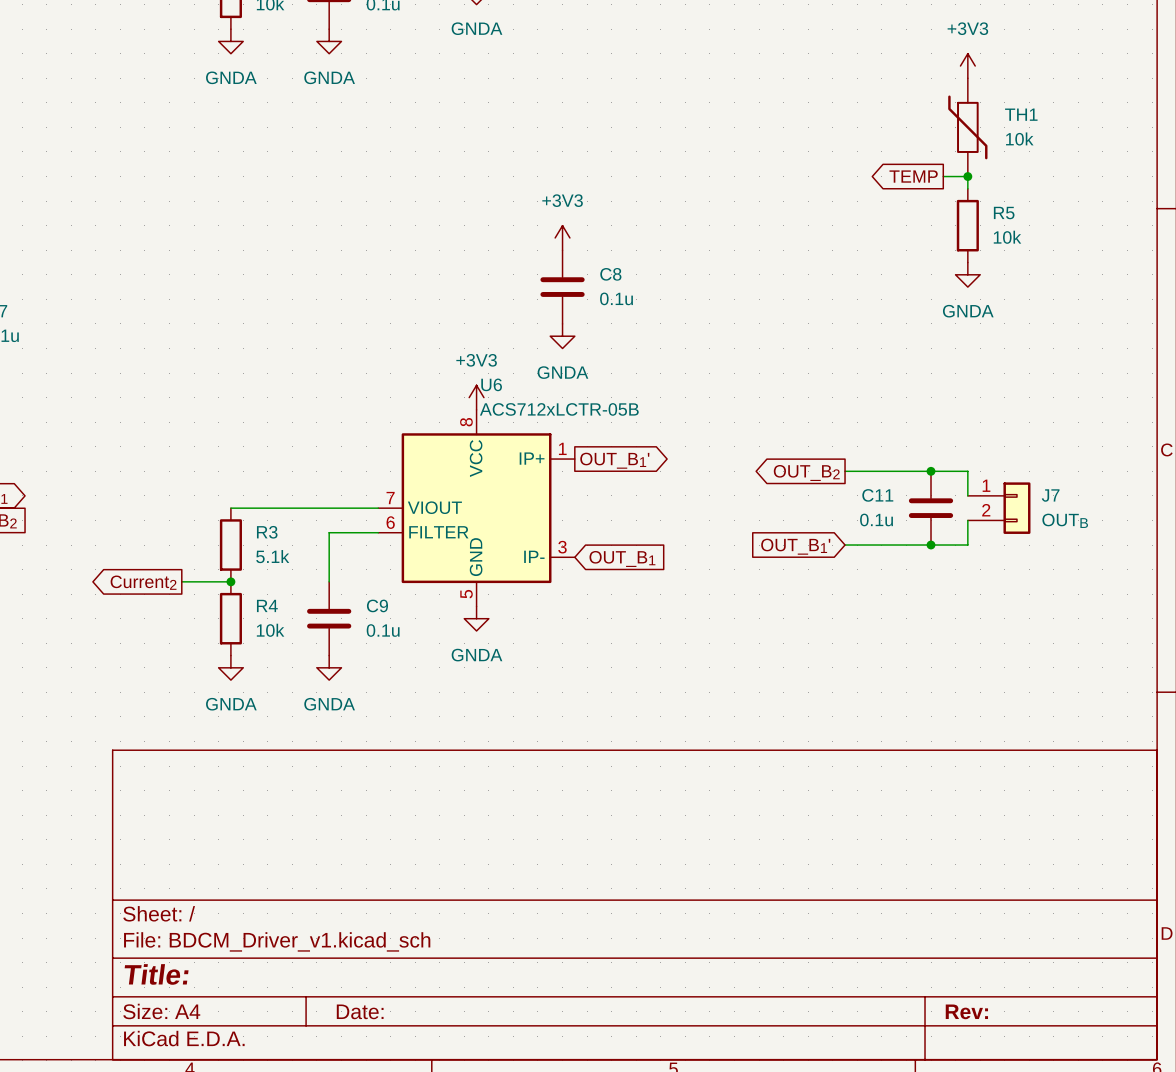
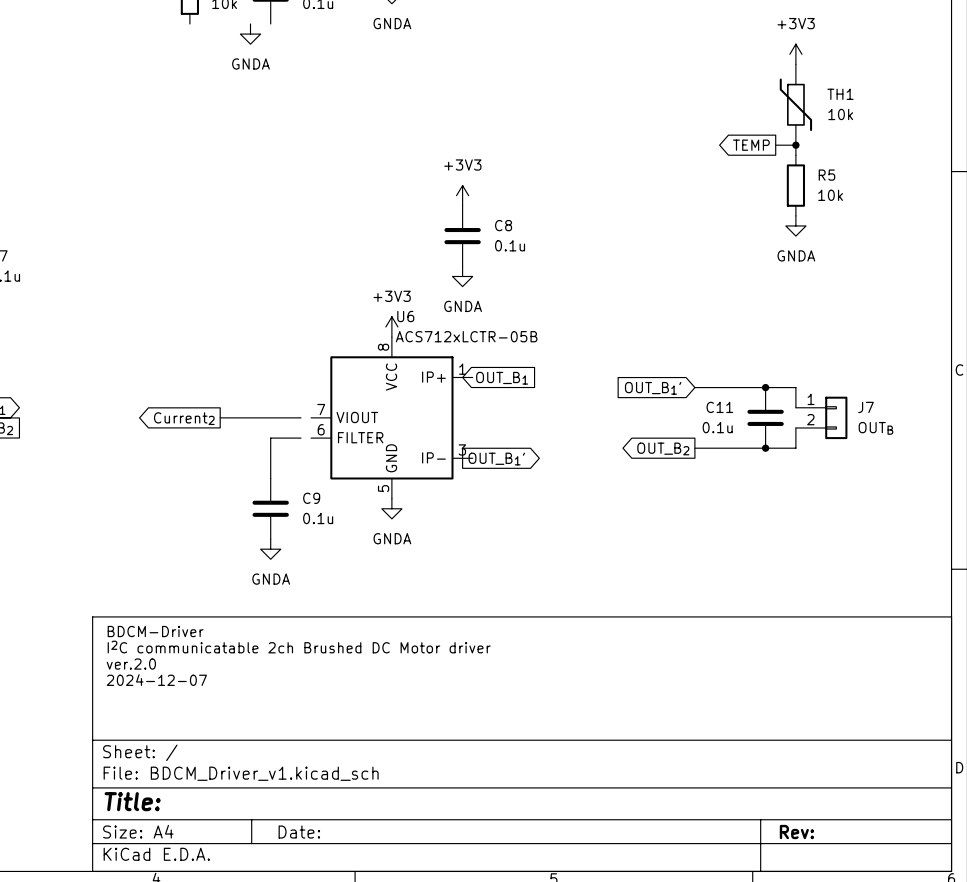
power symbol: GNDA (230, 41) -> none
power symbol position: GNDA (329, 41) -> GNDA (250, 34)
global label position: OUT_B1' (614, 460) -> OUT_B1' (496, 459)
global label shape: output (806, 472) -> input (653, 388)
global label: OUT_B2 (806, 472) -> OUT_B1' (653, 388)
wire: (230, 508) (267, 508) -> none
wire: (366, 508) (378, 508) -> none
wire: (366, 532) (378, 532) -> none
R3: 5.1k (230, 545) -> none
global label shape: input (795, 546) -> output (663, 448)
global label: OUT_B1' (795, 546) -> OUT_B2 (663, 448)
global label position: OUT_B1 (622, 558) -> OUT_B1 (502, 378)
wire: (181, 581) (230, 581) -> none
junction: (230, 581) -> none
global label position: Current2 (143, 582) -> Current2 (184, 418)
R4: 10k (230, 618) -> none
power symbol: GNDA (230, 667) -> none
text: none -> BDCM-Driver (155, 631)
text: none -> I2C communicatable 2ch Brushed DC Motor driver (299, 647)
text: none -> ver.2.0 (131, 664)
text: none -> 2024-12-07 (156, 680)

